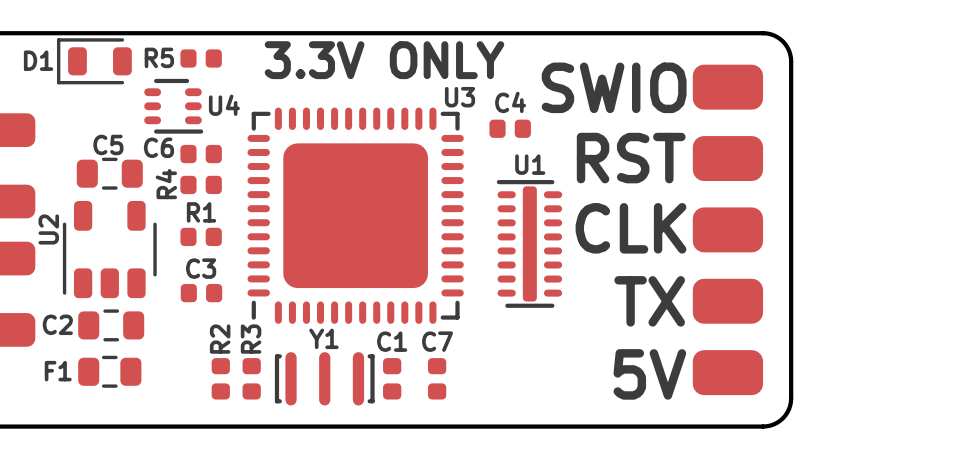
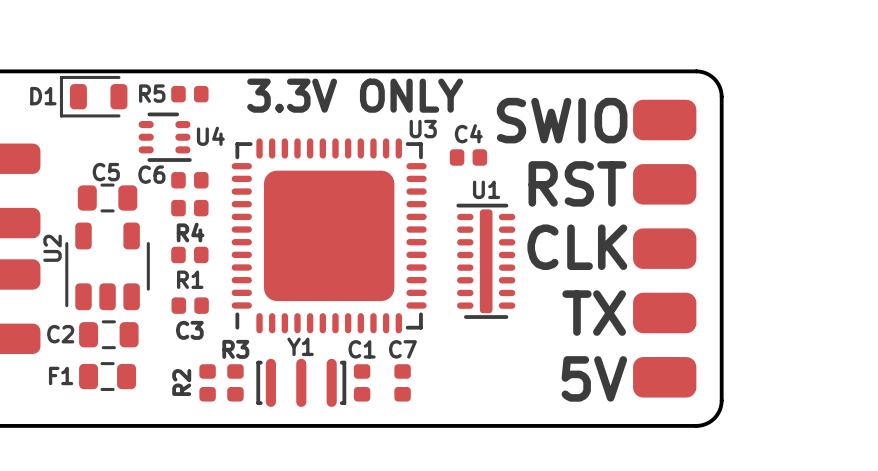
R4 name rotation: 0° (166, 184) -> 90° clockwise (190, 232)
R4 name position: R4 (166, 184) -> R4 (190, 232)
R1 name position: R1 (201, 212) -> R1 (190, 279)
C3 name position: C3 (201, 268) -> C3 (189, 330)
R2 name position: R2 (220, 339) -> R2 (181, 382)
R3 name rotation: 0° (251, 339) -> 90° clockwise (235, 349)

